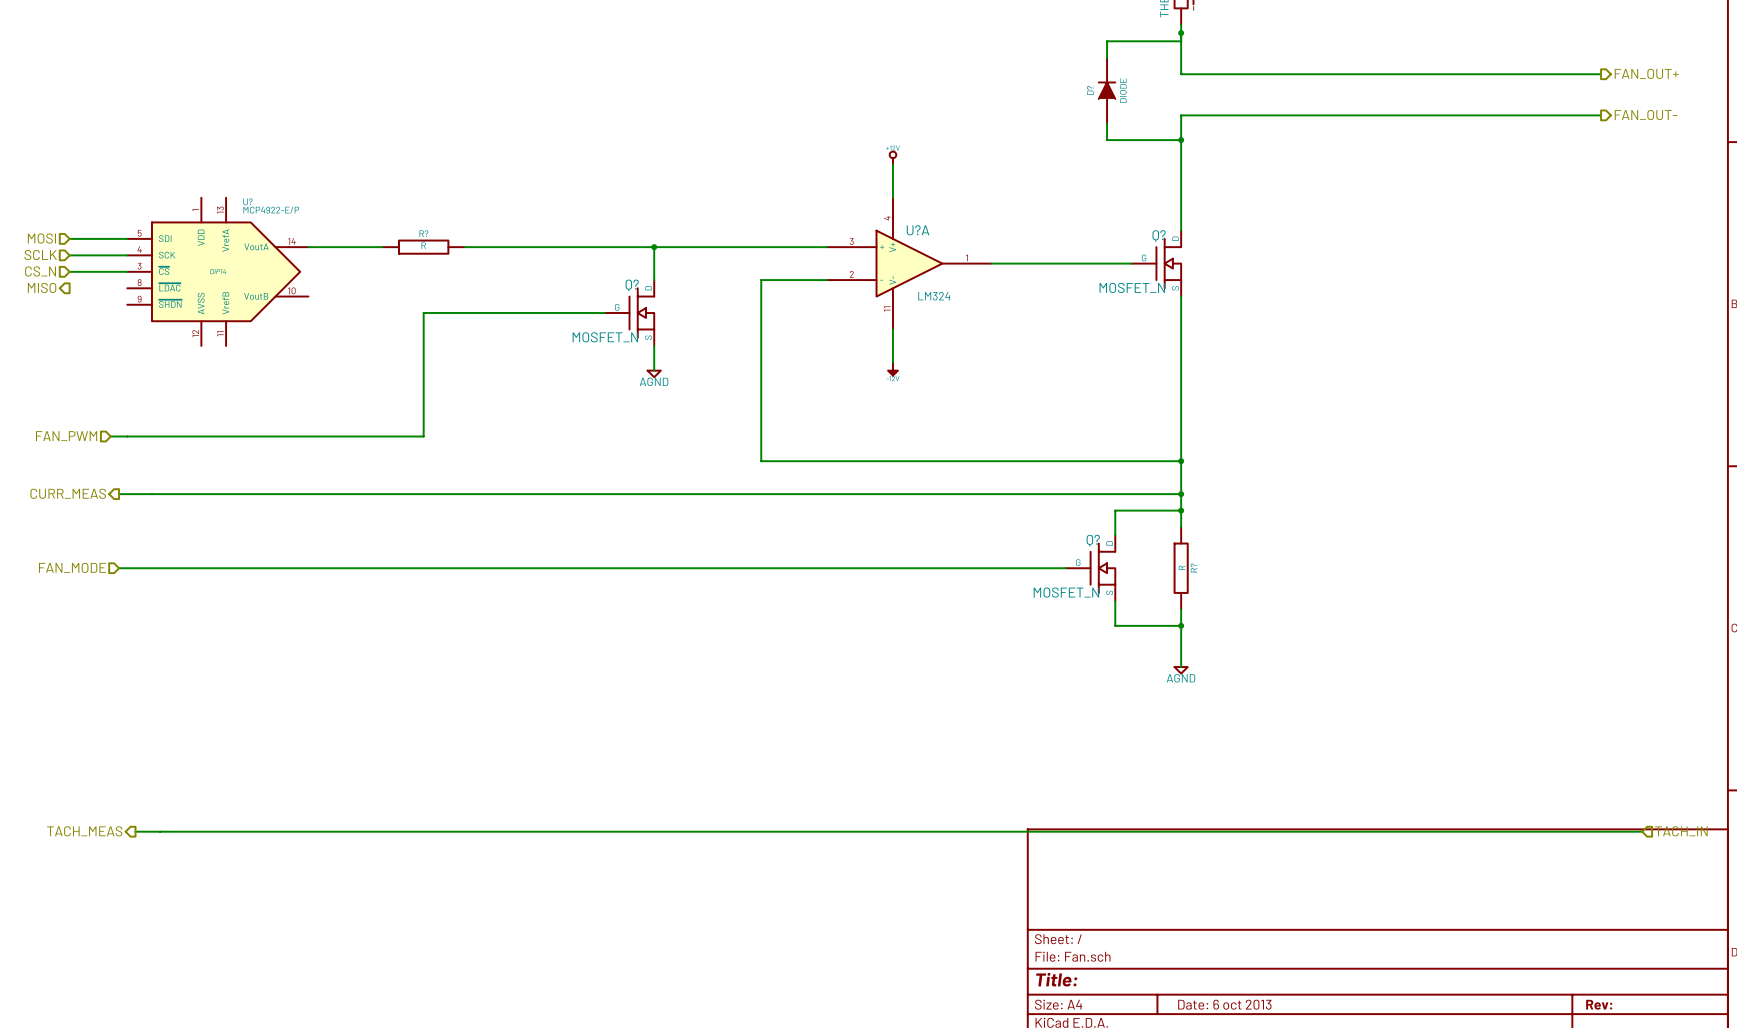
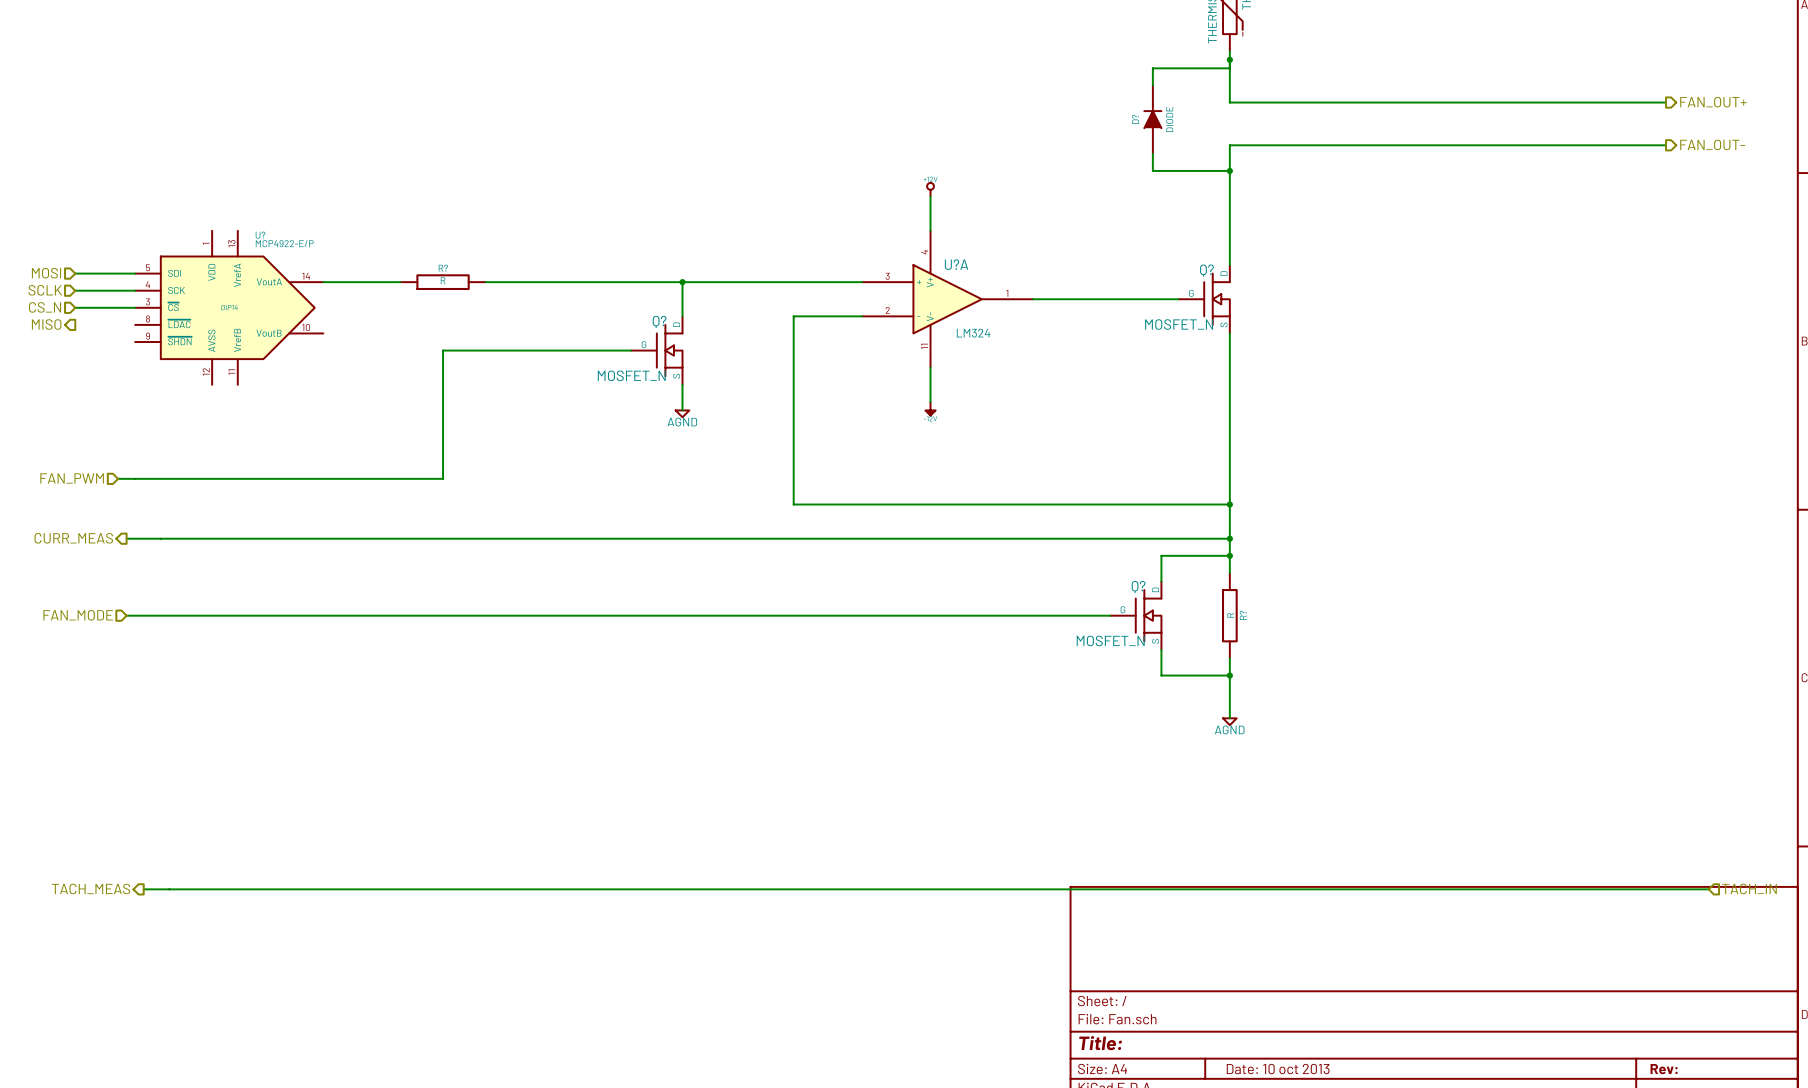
title block: Date: 6 oct 2013 (1224, 1004) -> Date: 10 oct 2013 (1278, 1069)

